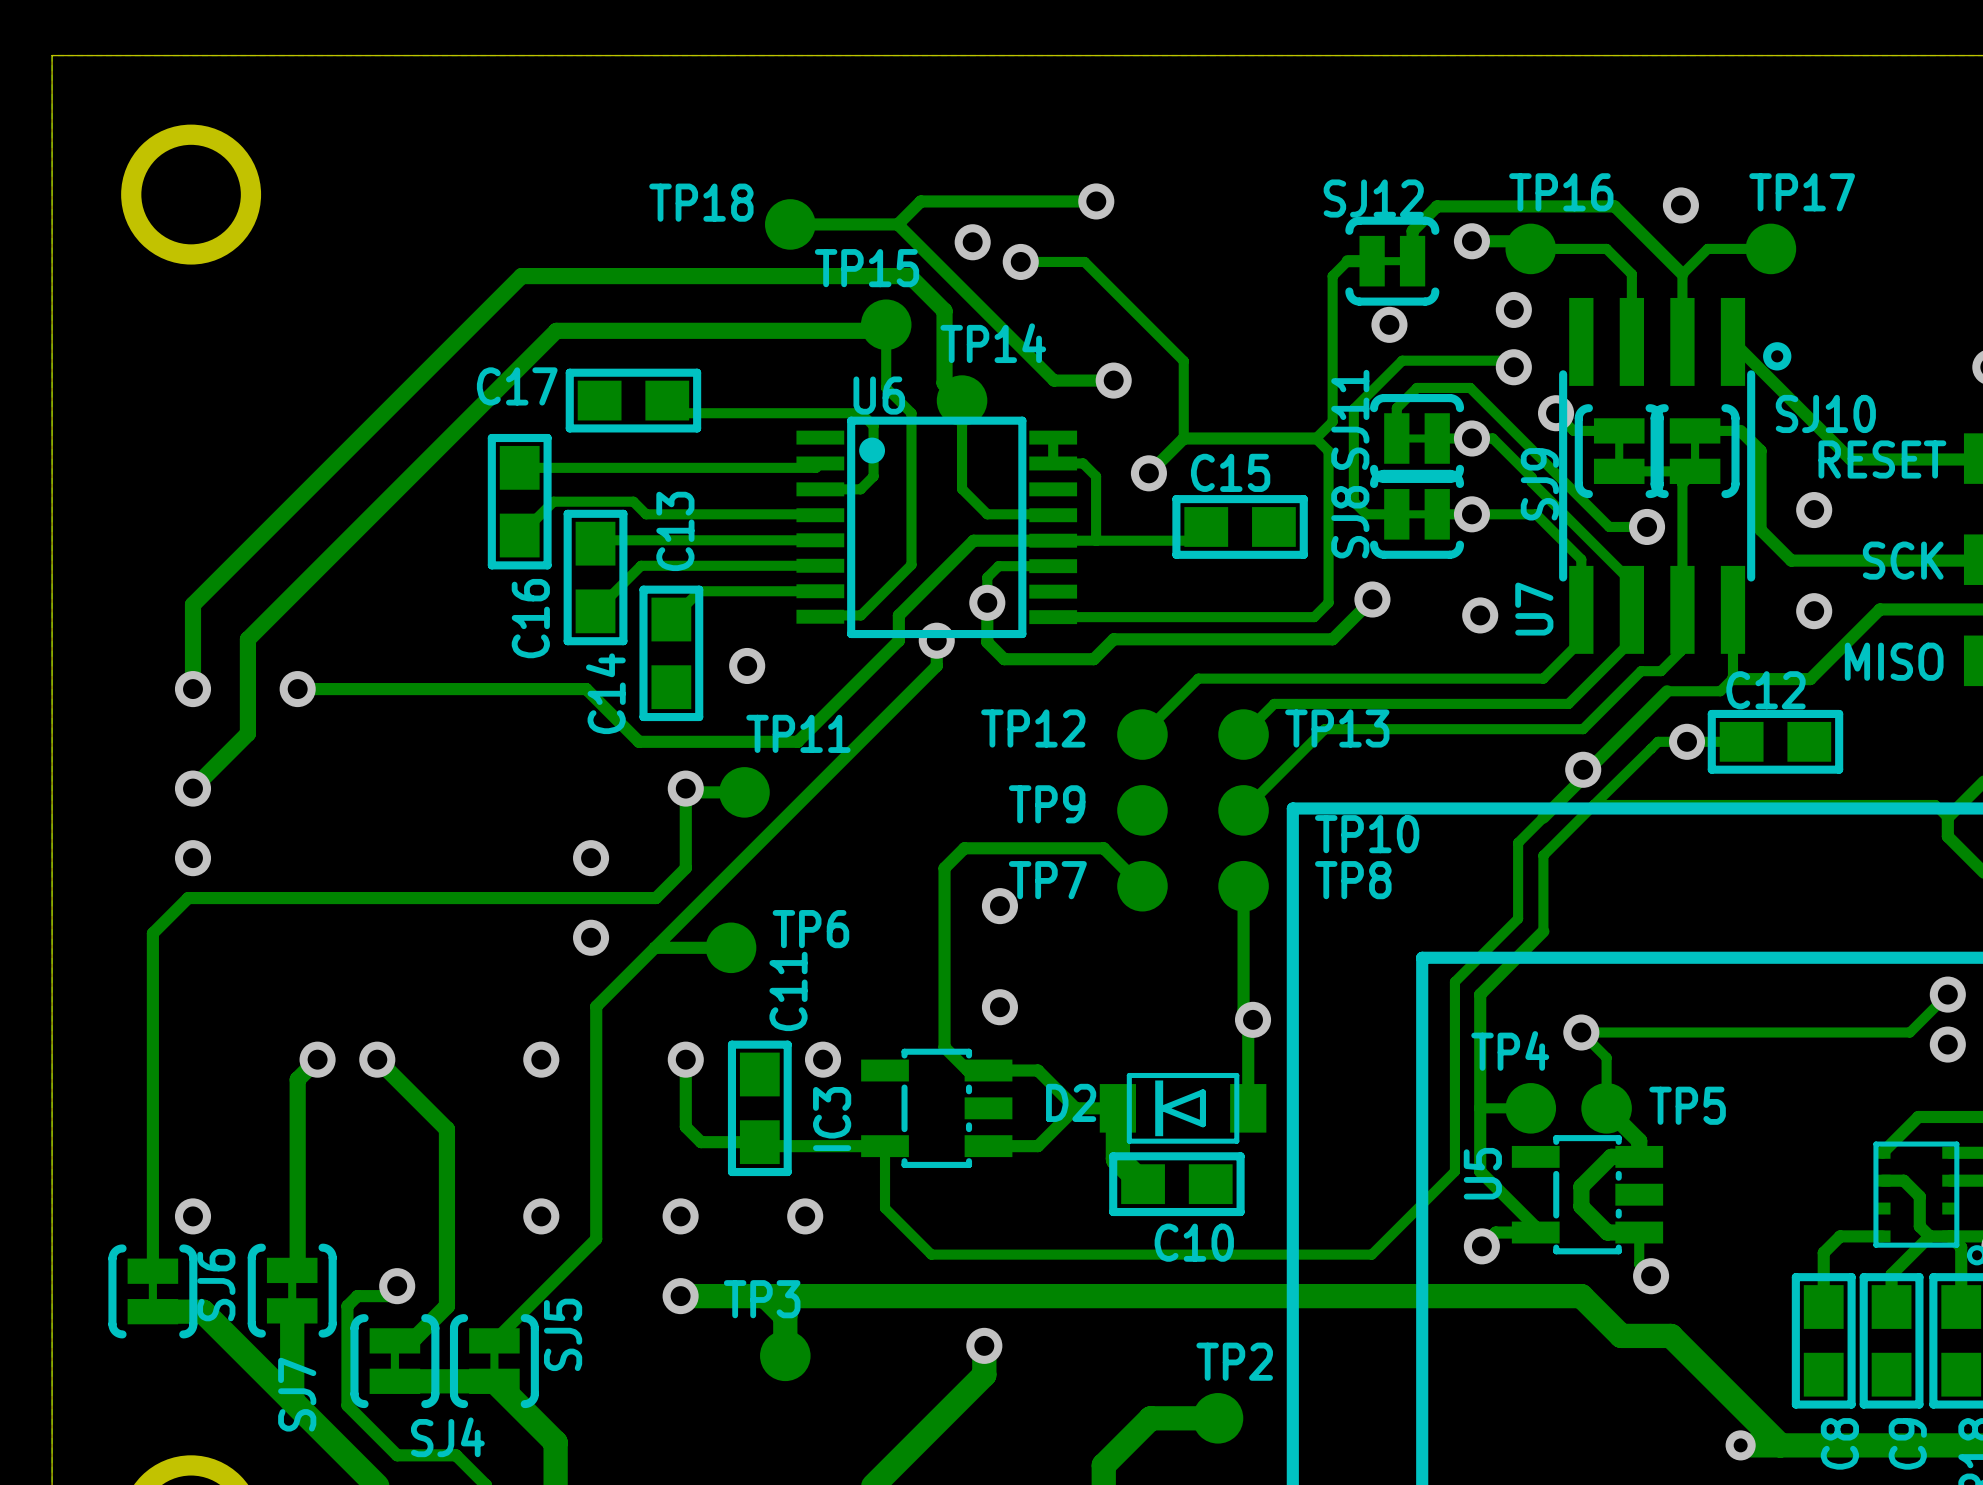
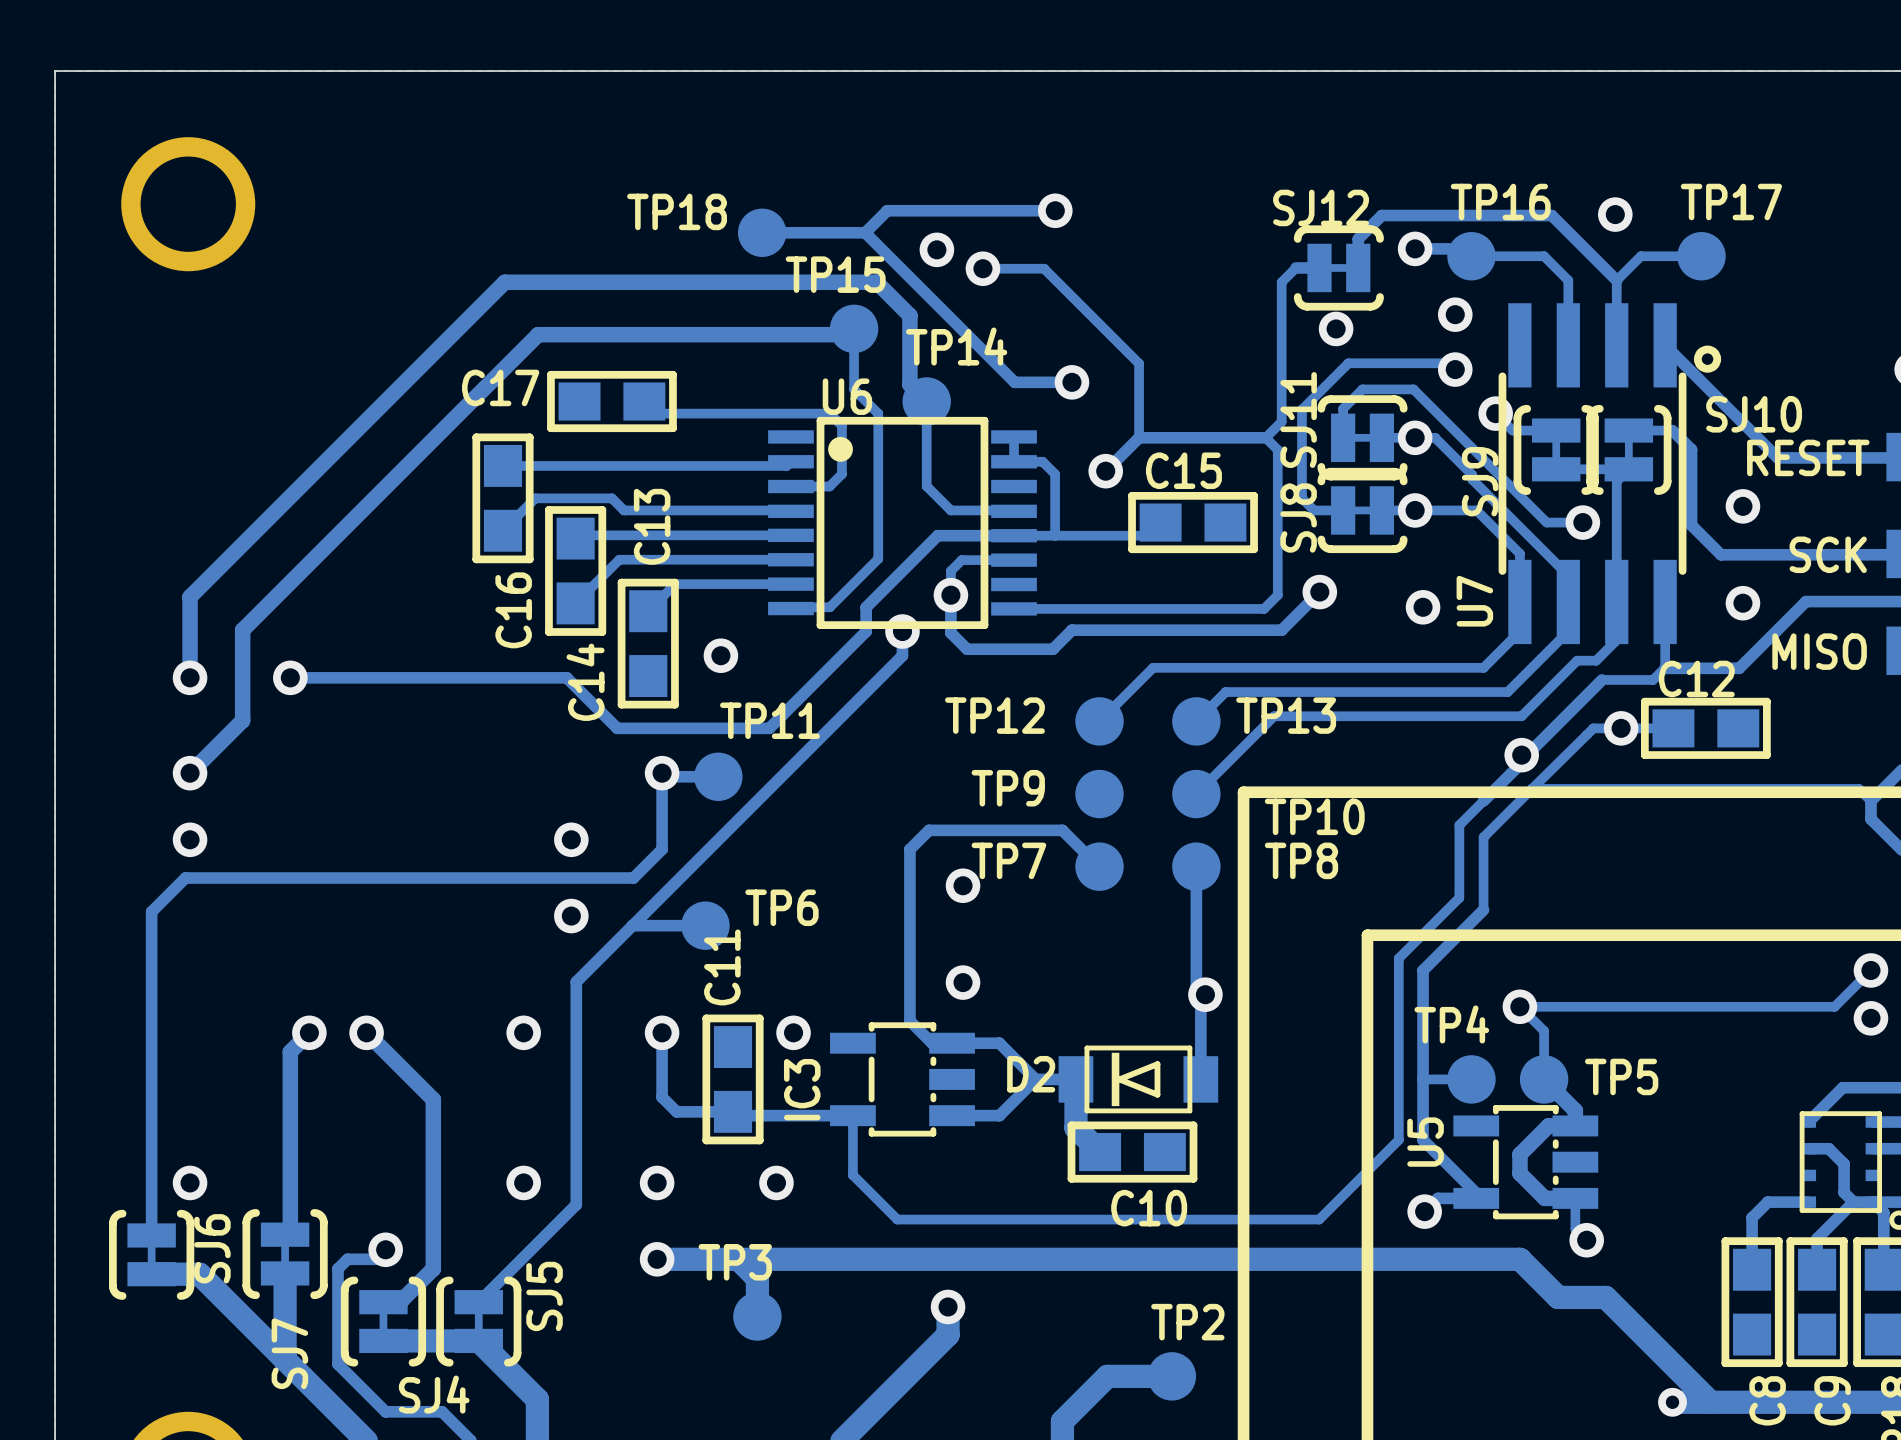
C11 name position: C11 (788, 991) -> C11 (722, 967)

